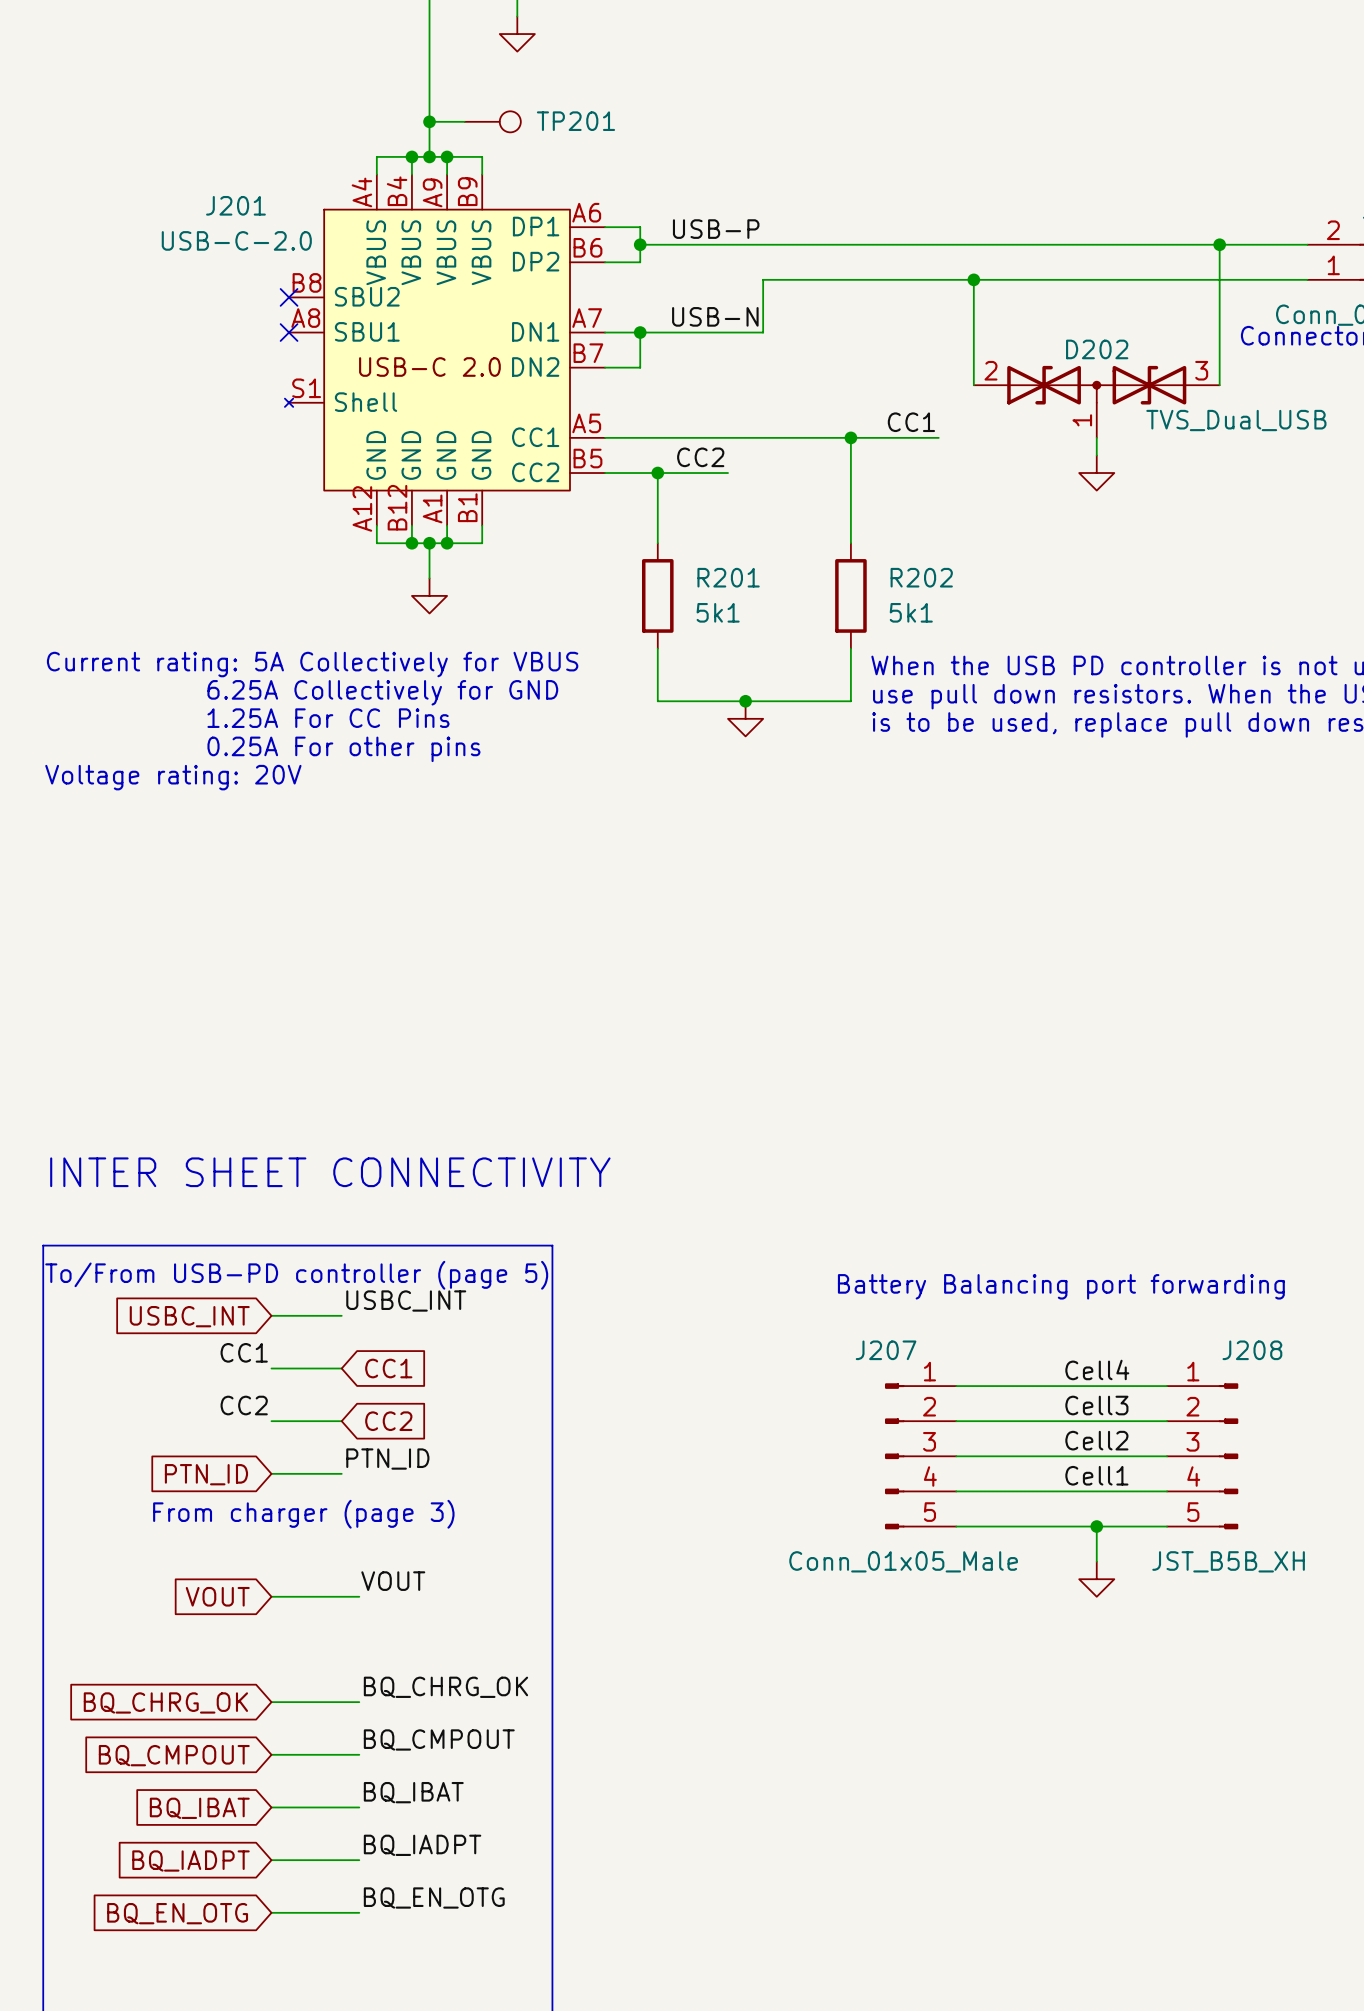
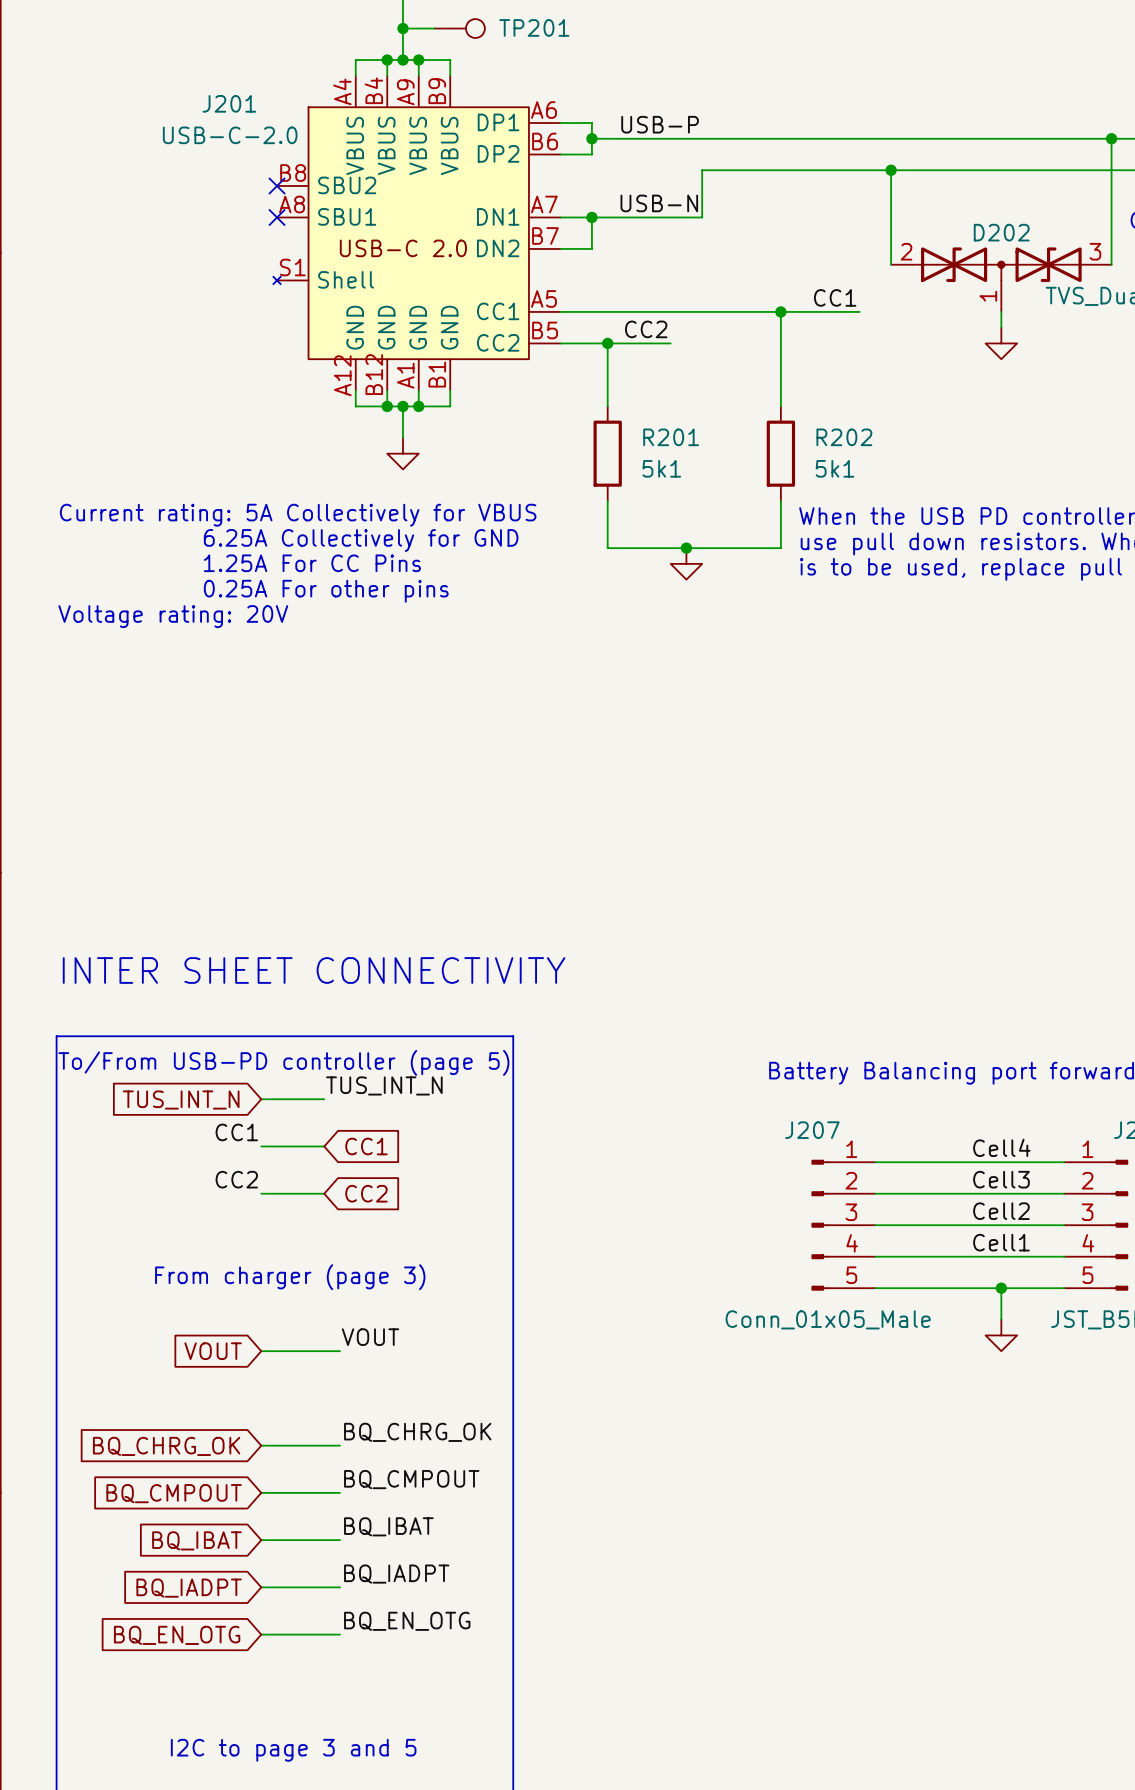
label: USBC_INT (406, 1301) -> TUS_INT_N (384, 1085)
global label: USBC_INT (189, 1316) -> TUS_INT_N (181, 1100)
label: PTN_ID (387, 1459) -> none
wire: (271, 1473) (341, 1473) -> none
global label: PTN_ID (206, 1474) -> none

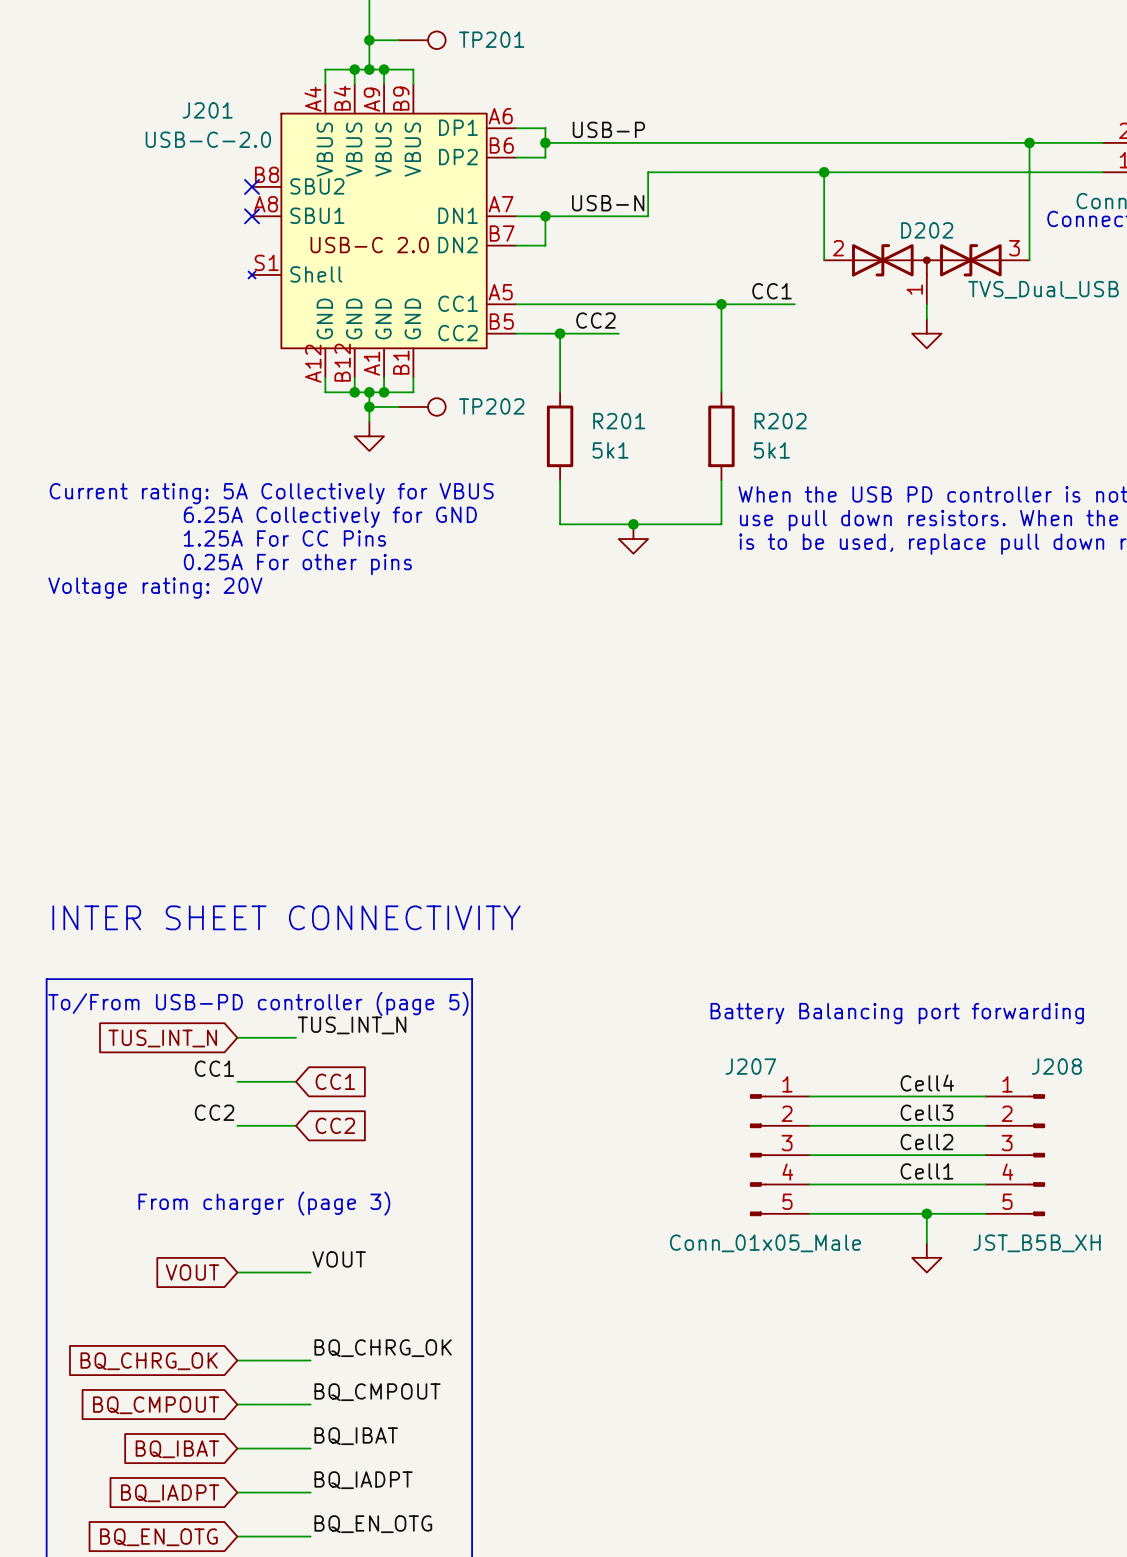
wire: none -> (369, 406) (398, 406)
junction: none -> (369, 406)
TP202: none -> (422, 406)

